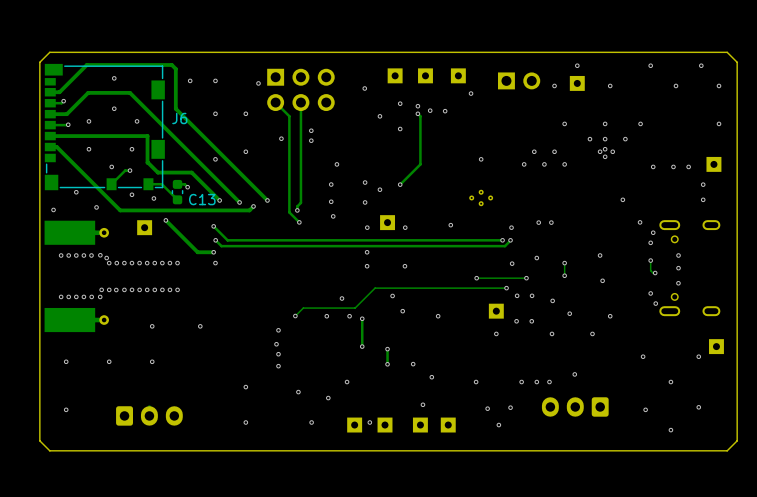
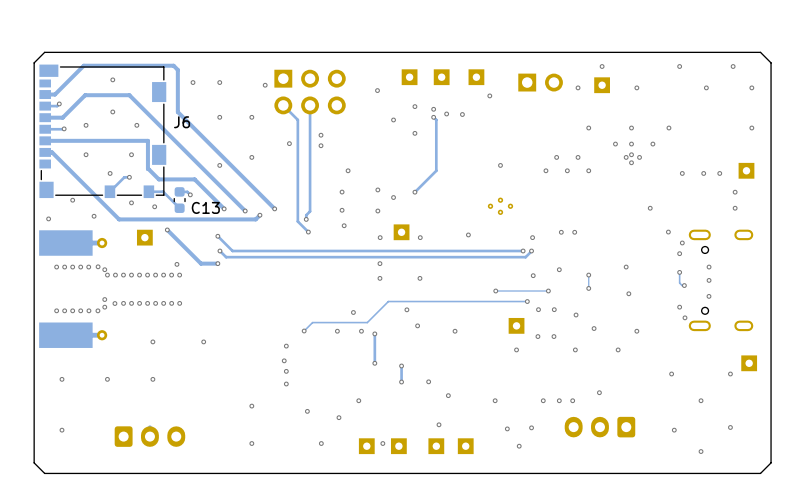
via: none -> (176, 264)
via: (215, 263) -> none
via: none -> (104, 299)
via: (101, 289) -> none
via: (109, 289) -> none
via: none -> (104, 307)

